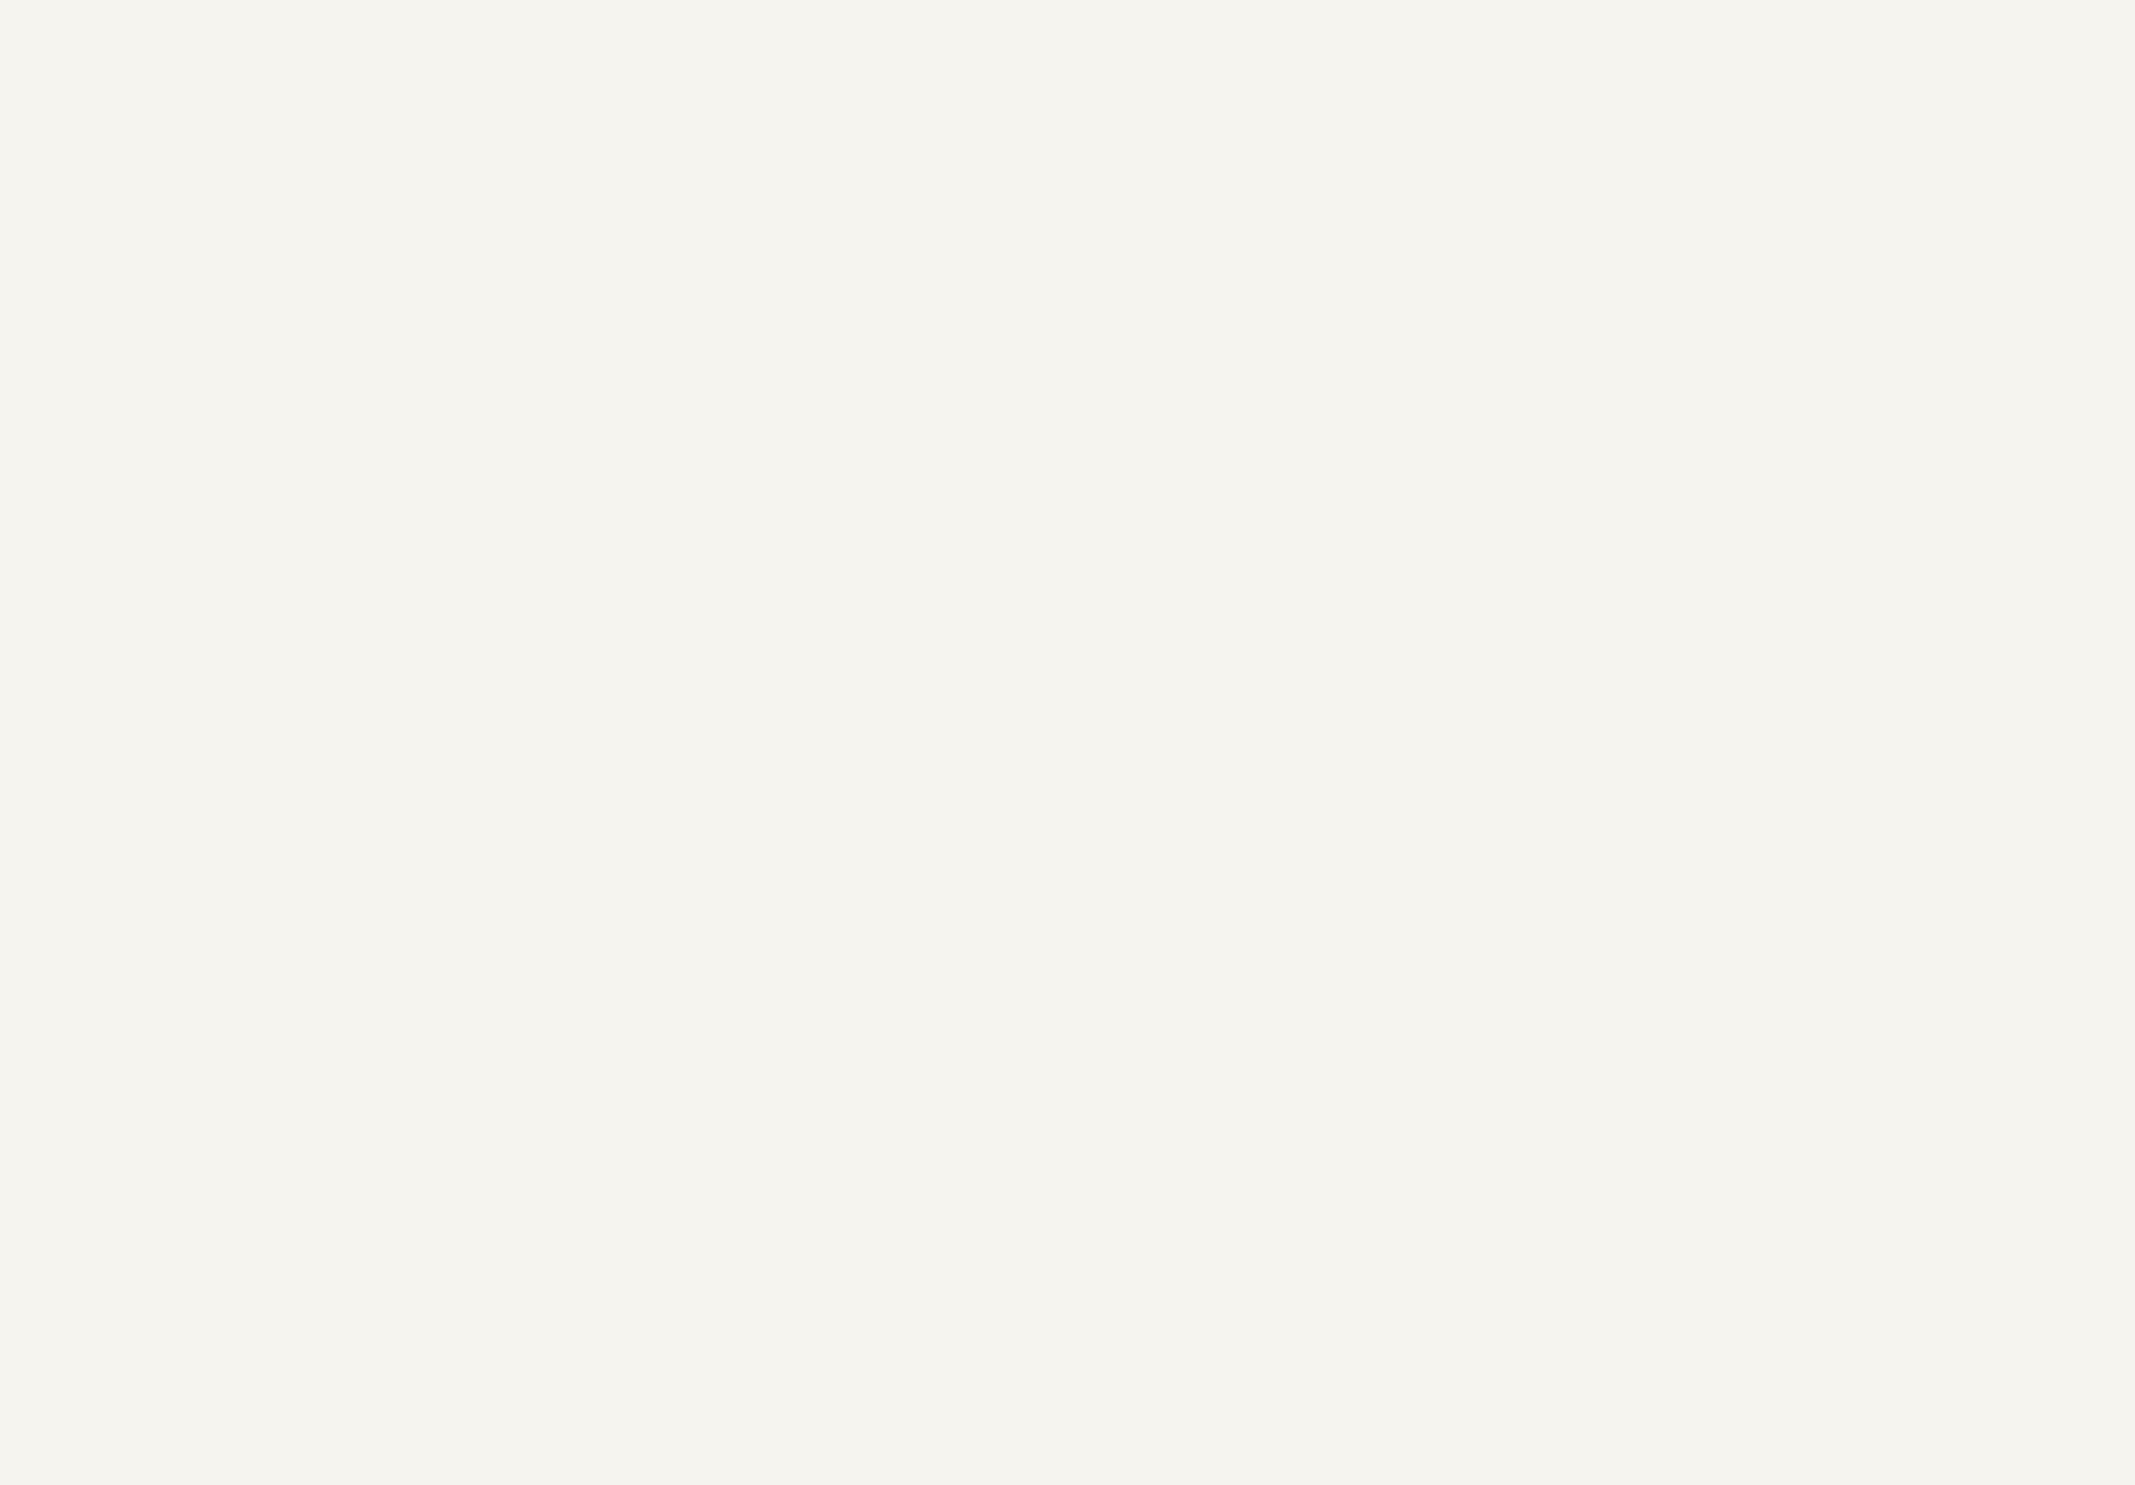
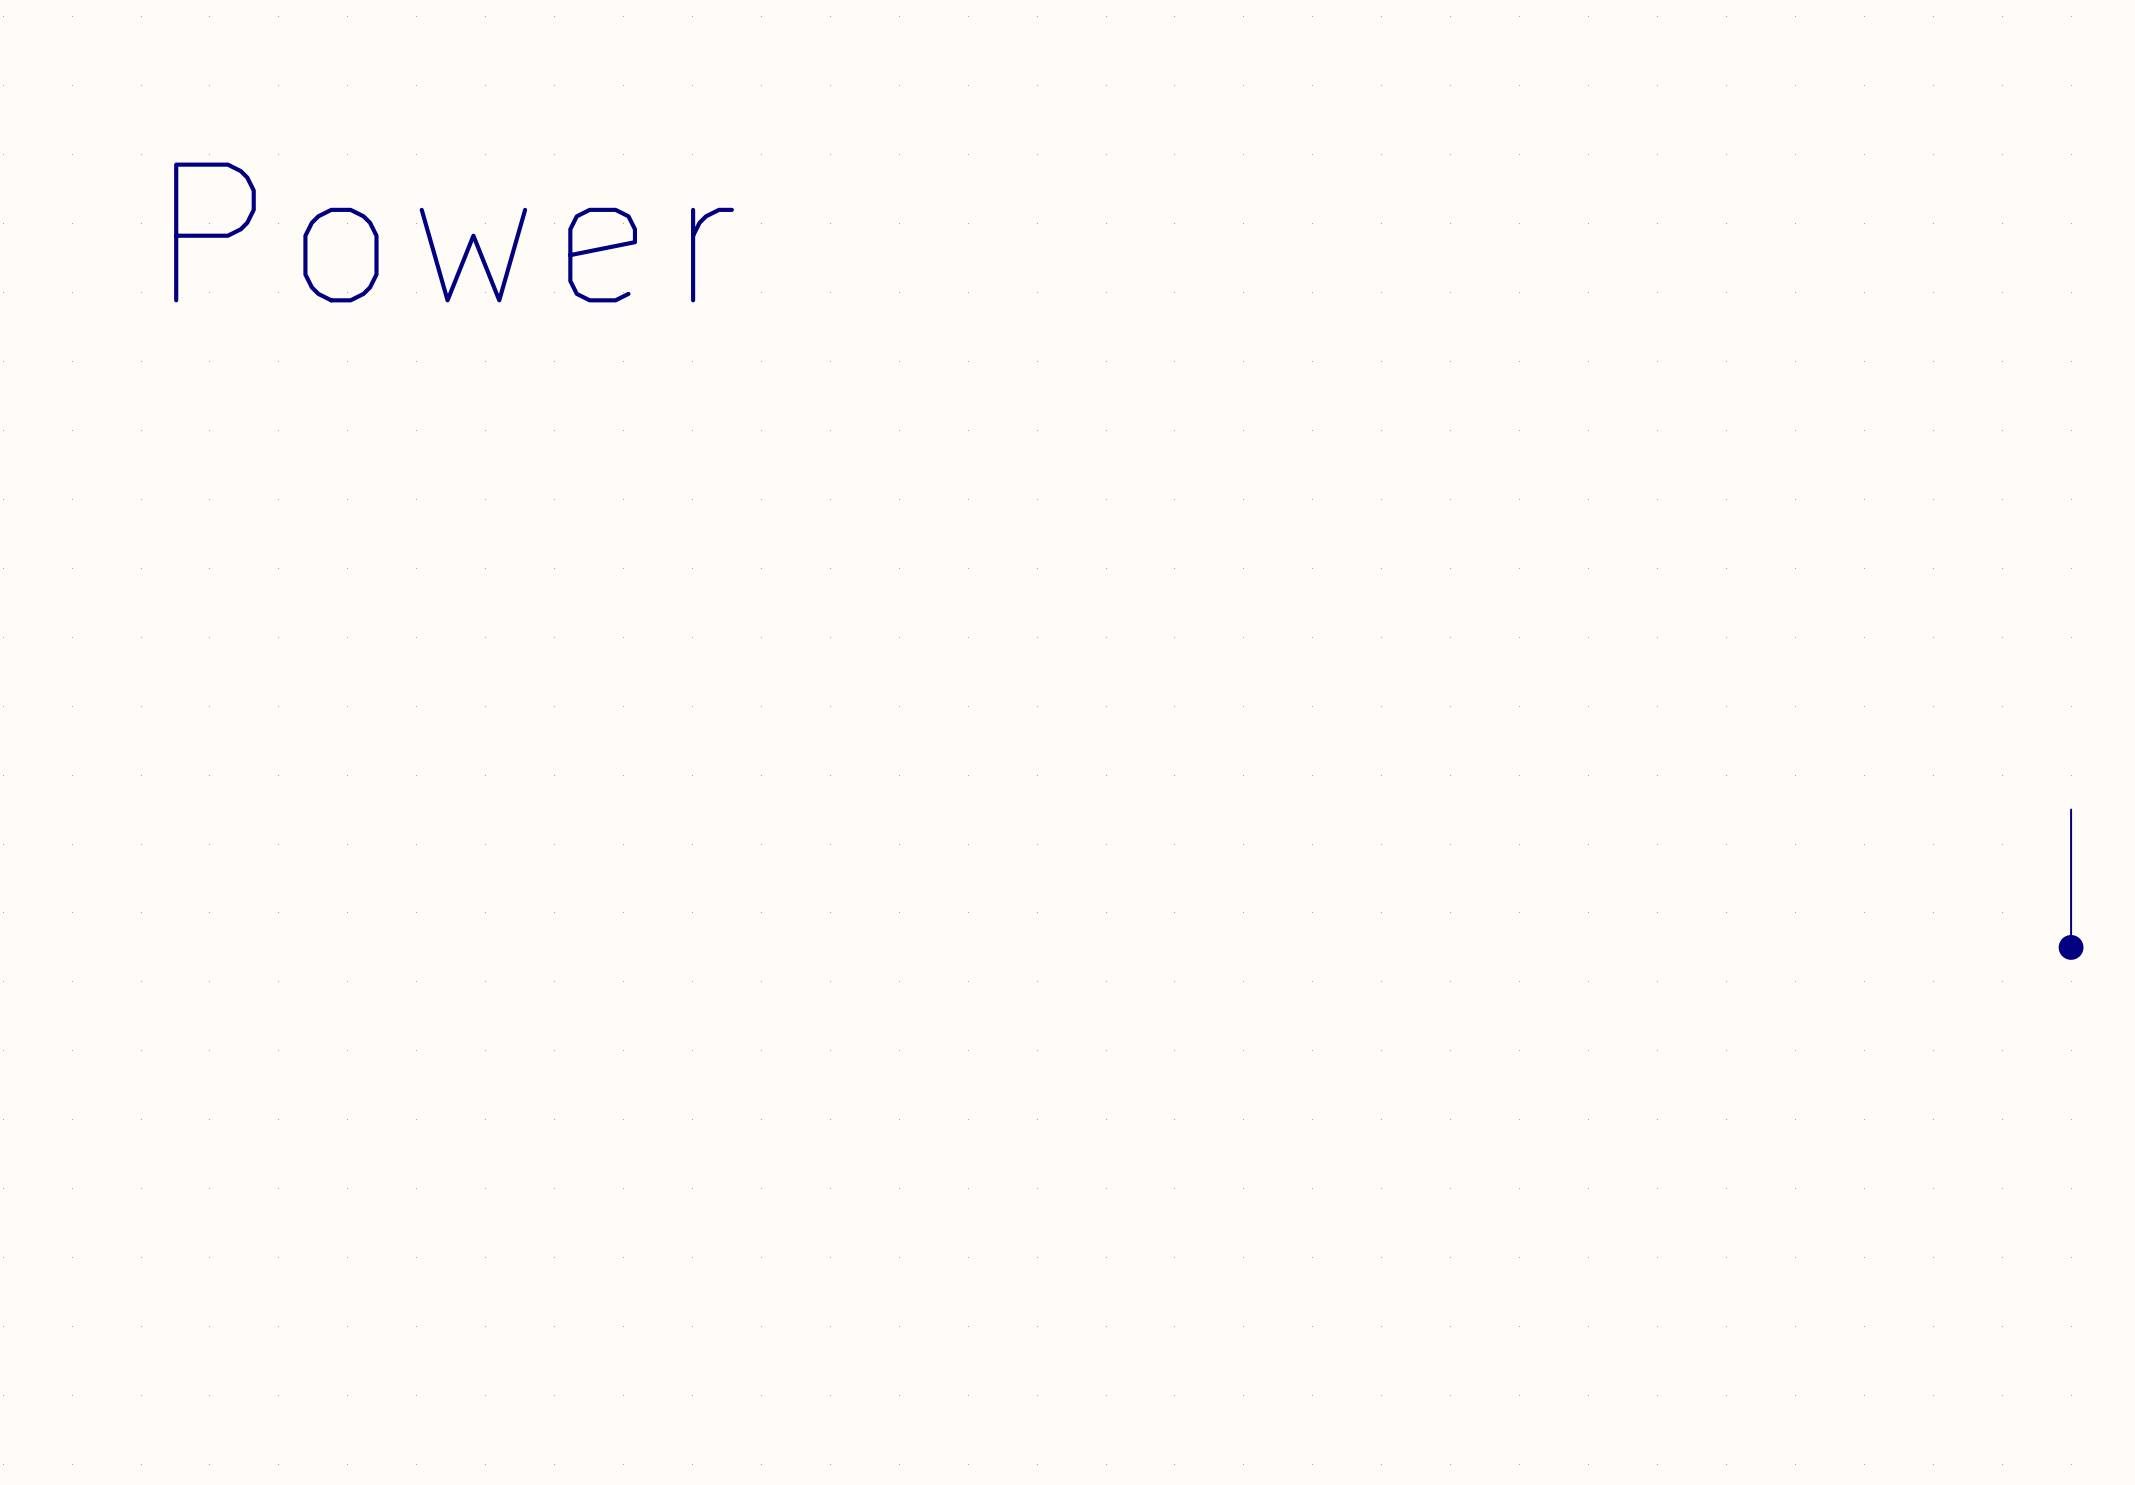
text: none -> Power (454, 232)
wire: none -> (2071, 809) (2071, 947)
junction: none -> (2071, 947)

